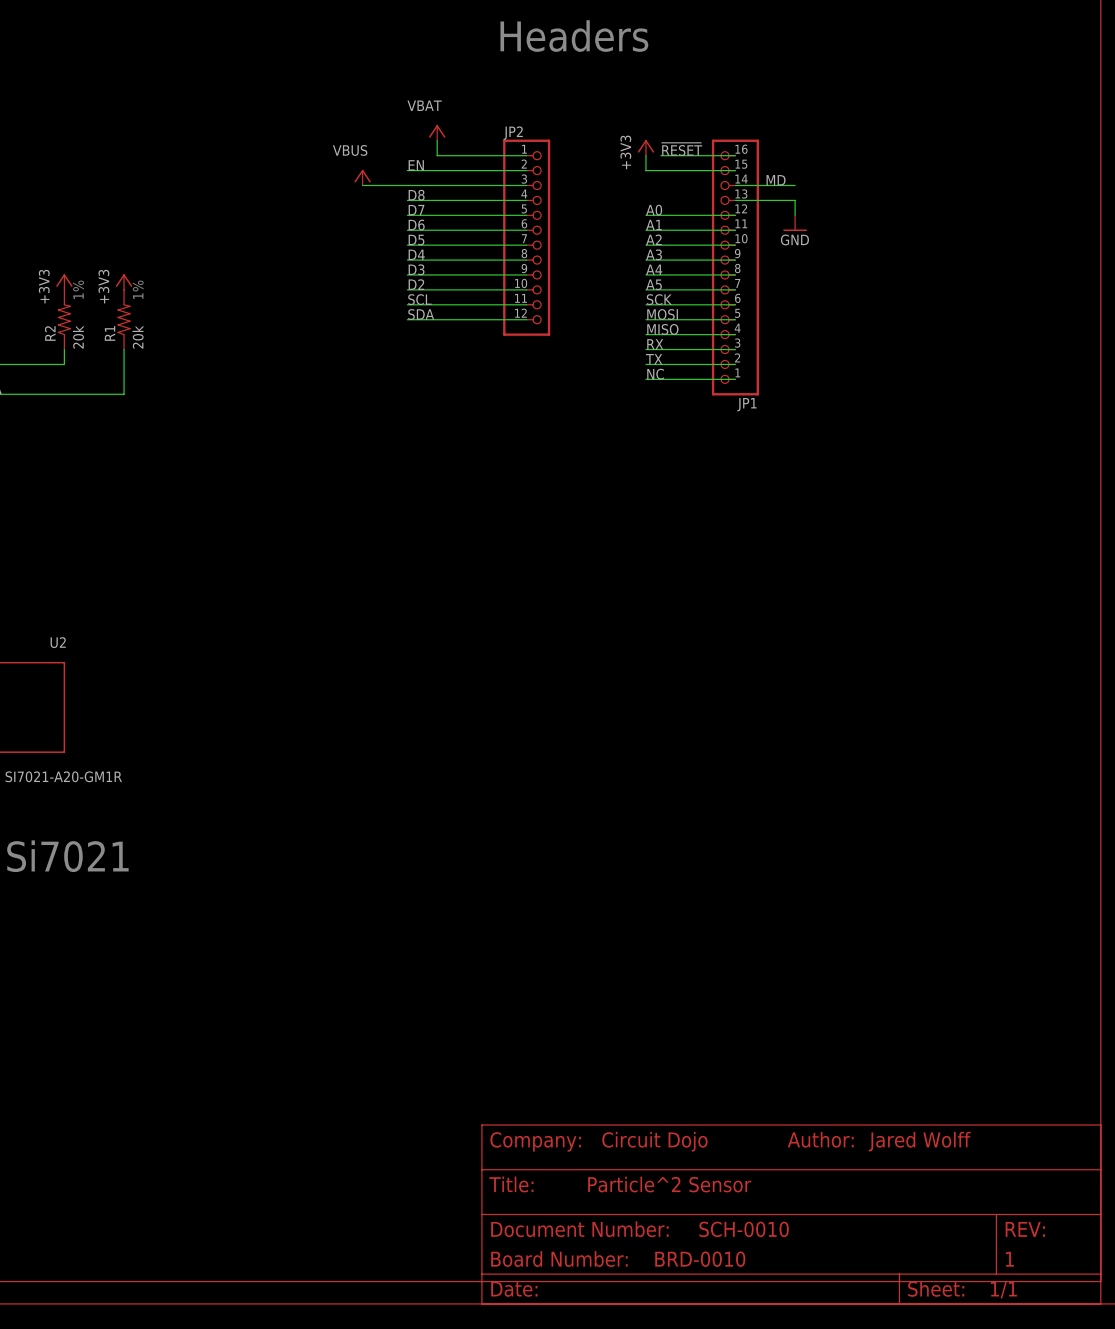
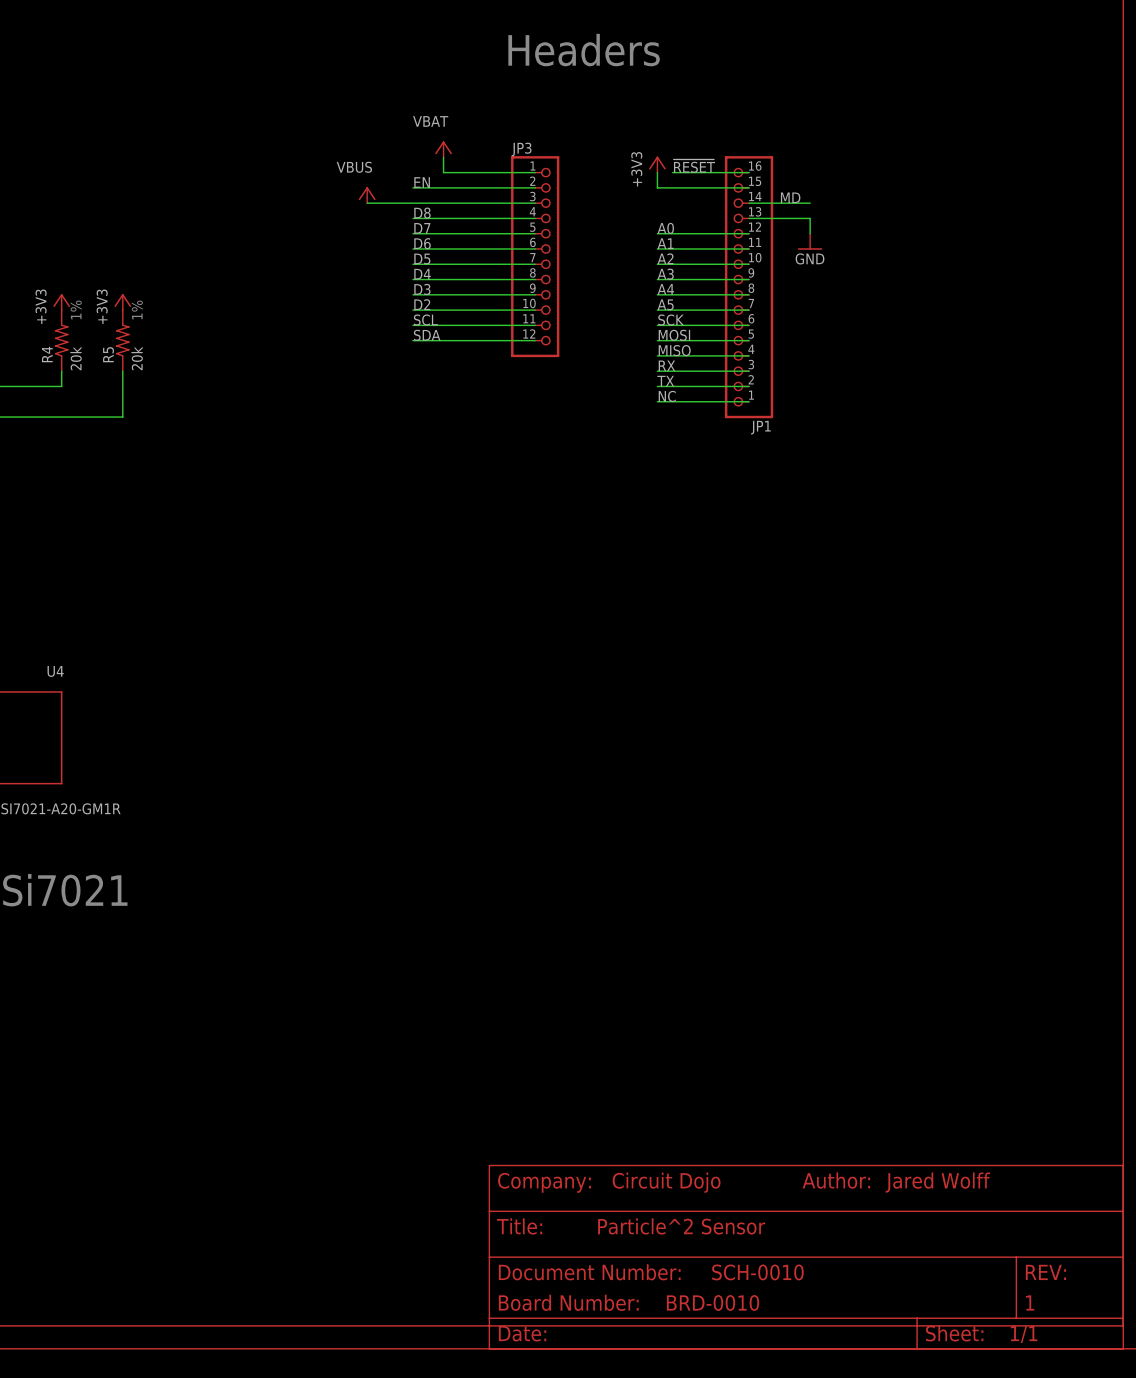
JP2 name: JP2 (513, 133) -> JP3 (521, 149)
R2 name: R2 (50, 333) -> R4 (47, 354)
R1 name: R1 (110, 333) -> R5 (108, 354)
U2 name: U2 (58, 642) -> U4 (55, 671)

